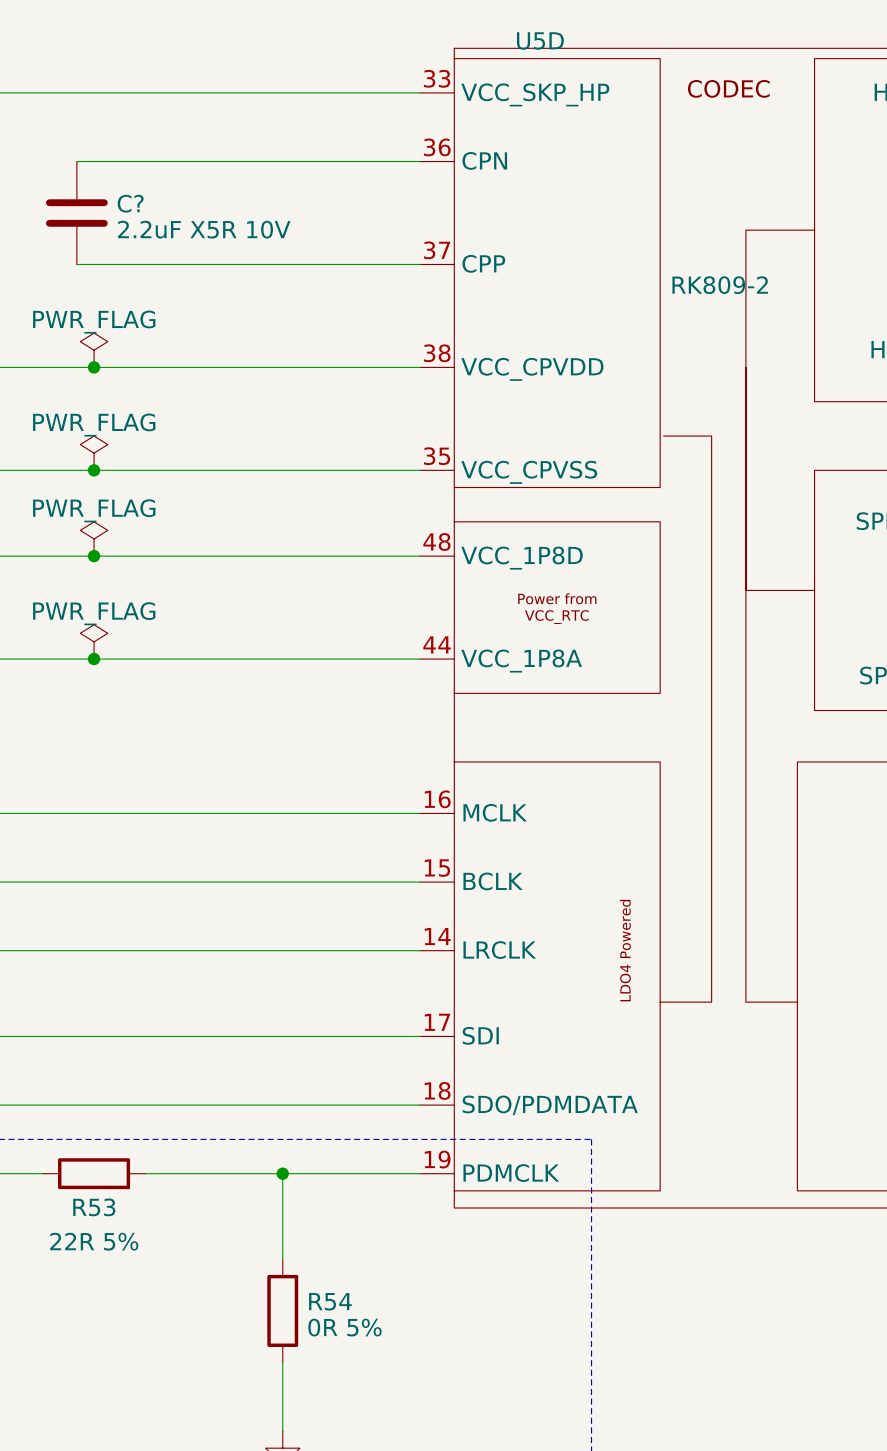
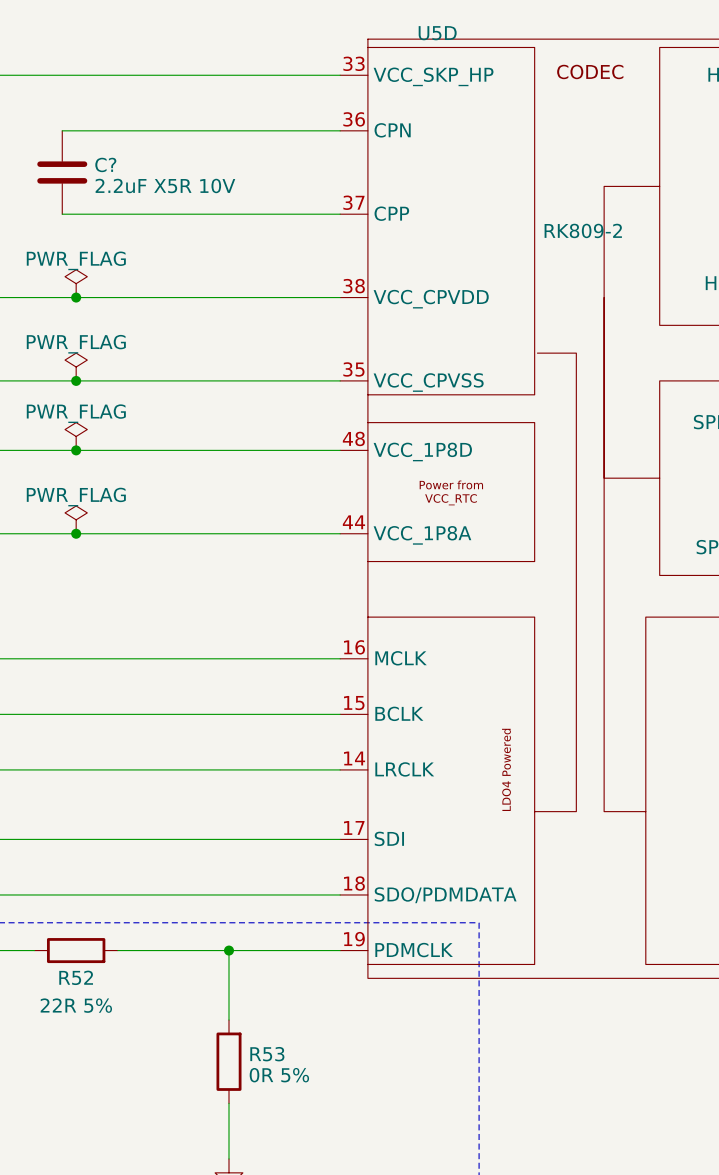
R53 name: R53 (94, 1207) -> R52 (76, 977)
R54 name: R54 (330, 1301) -> R53 (267, 1054)

